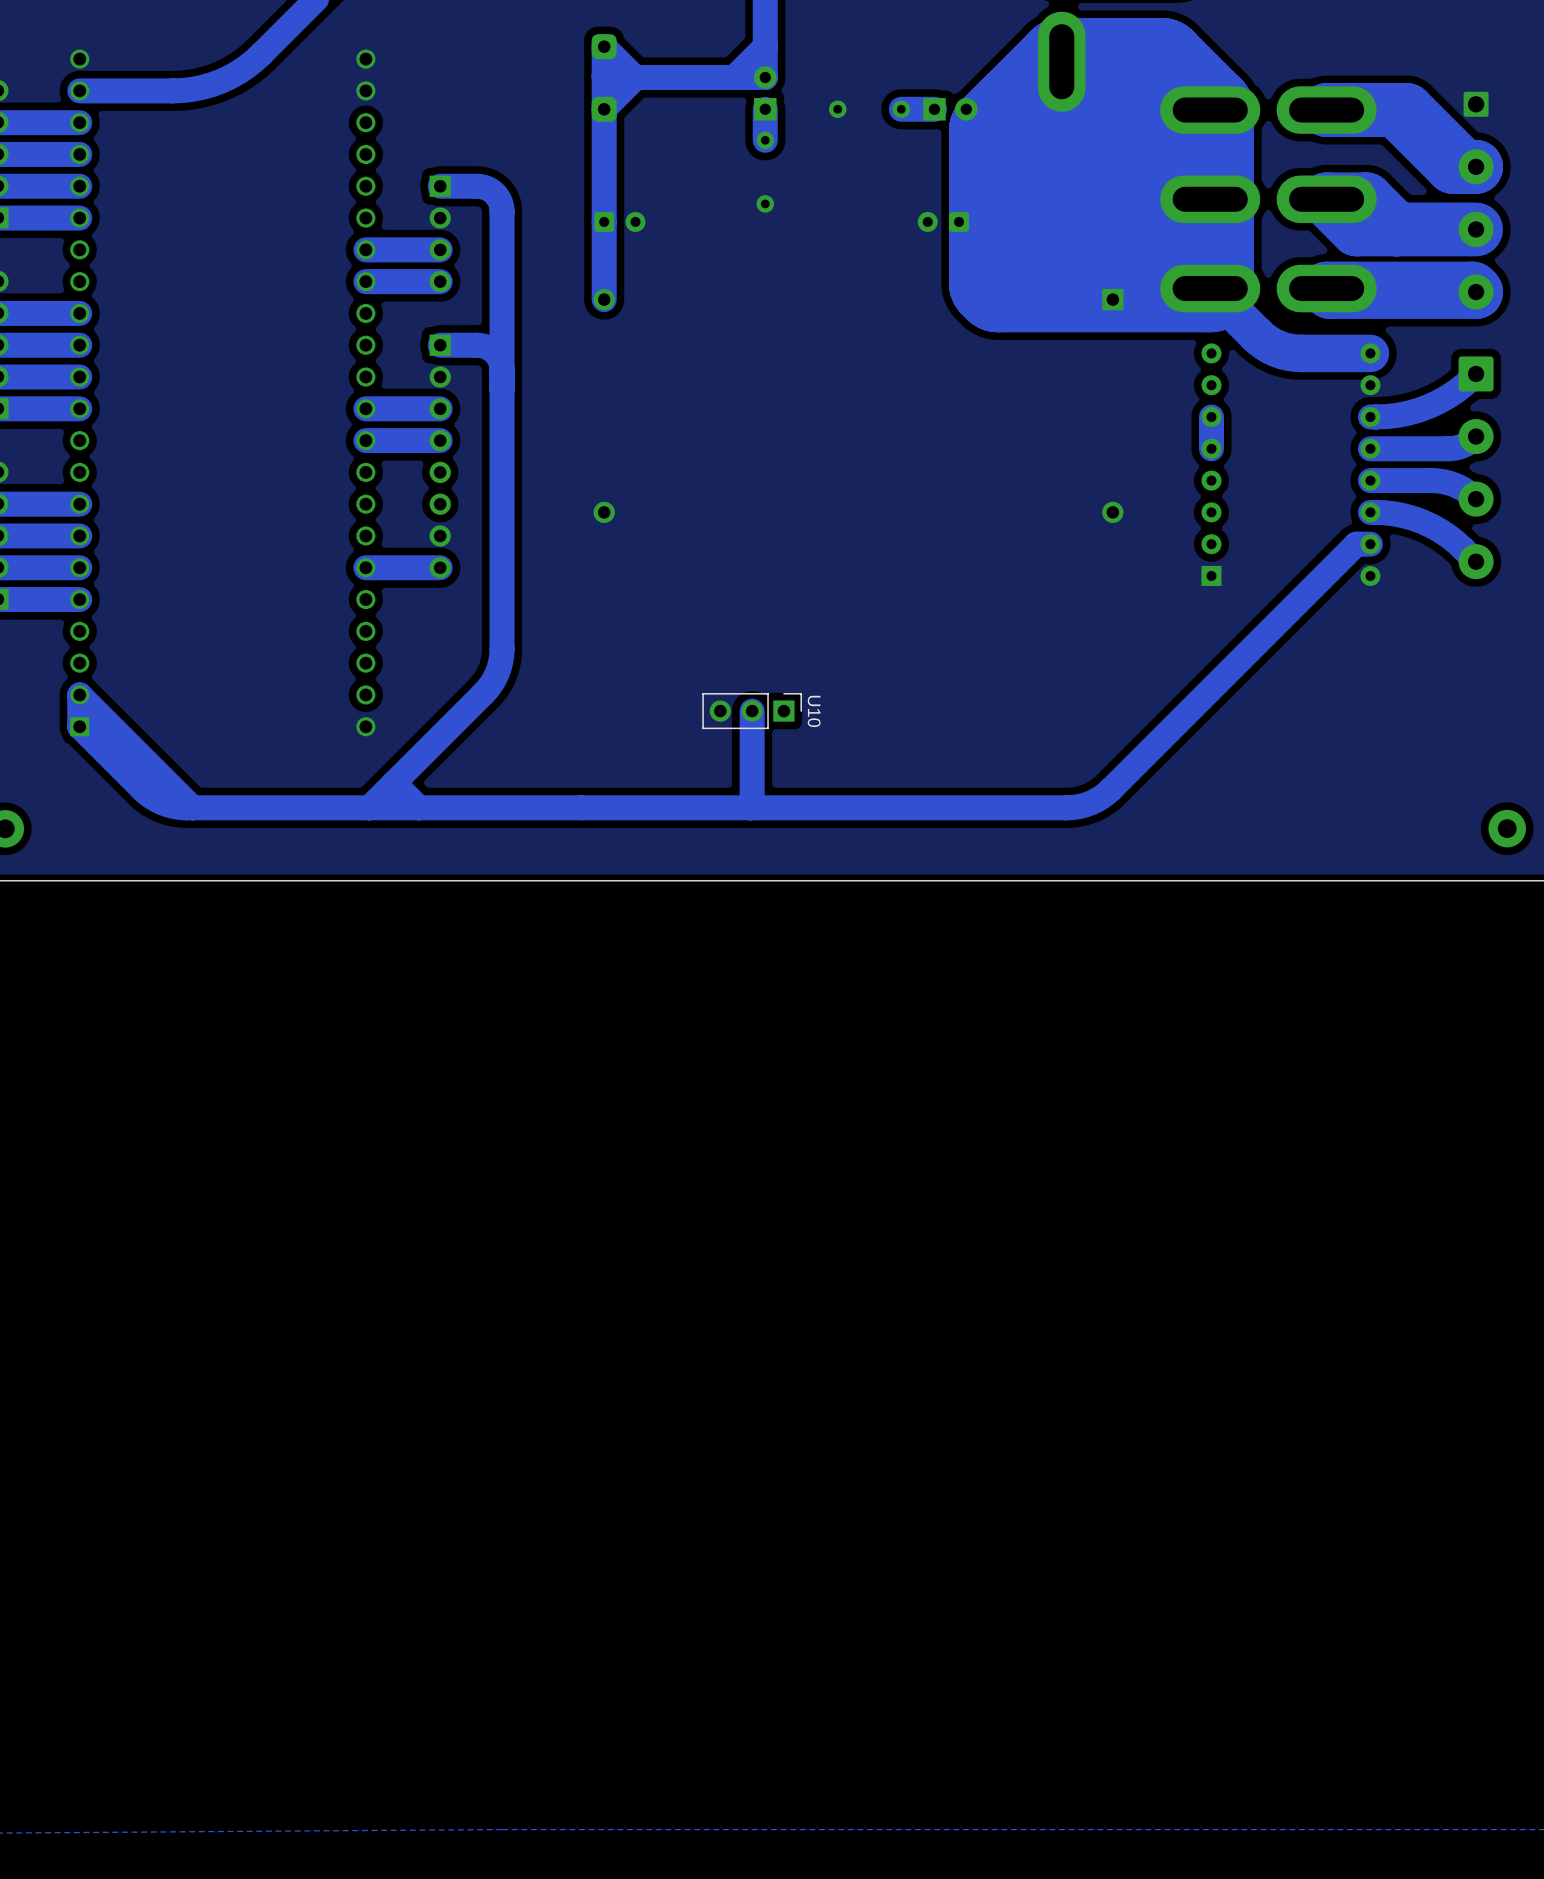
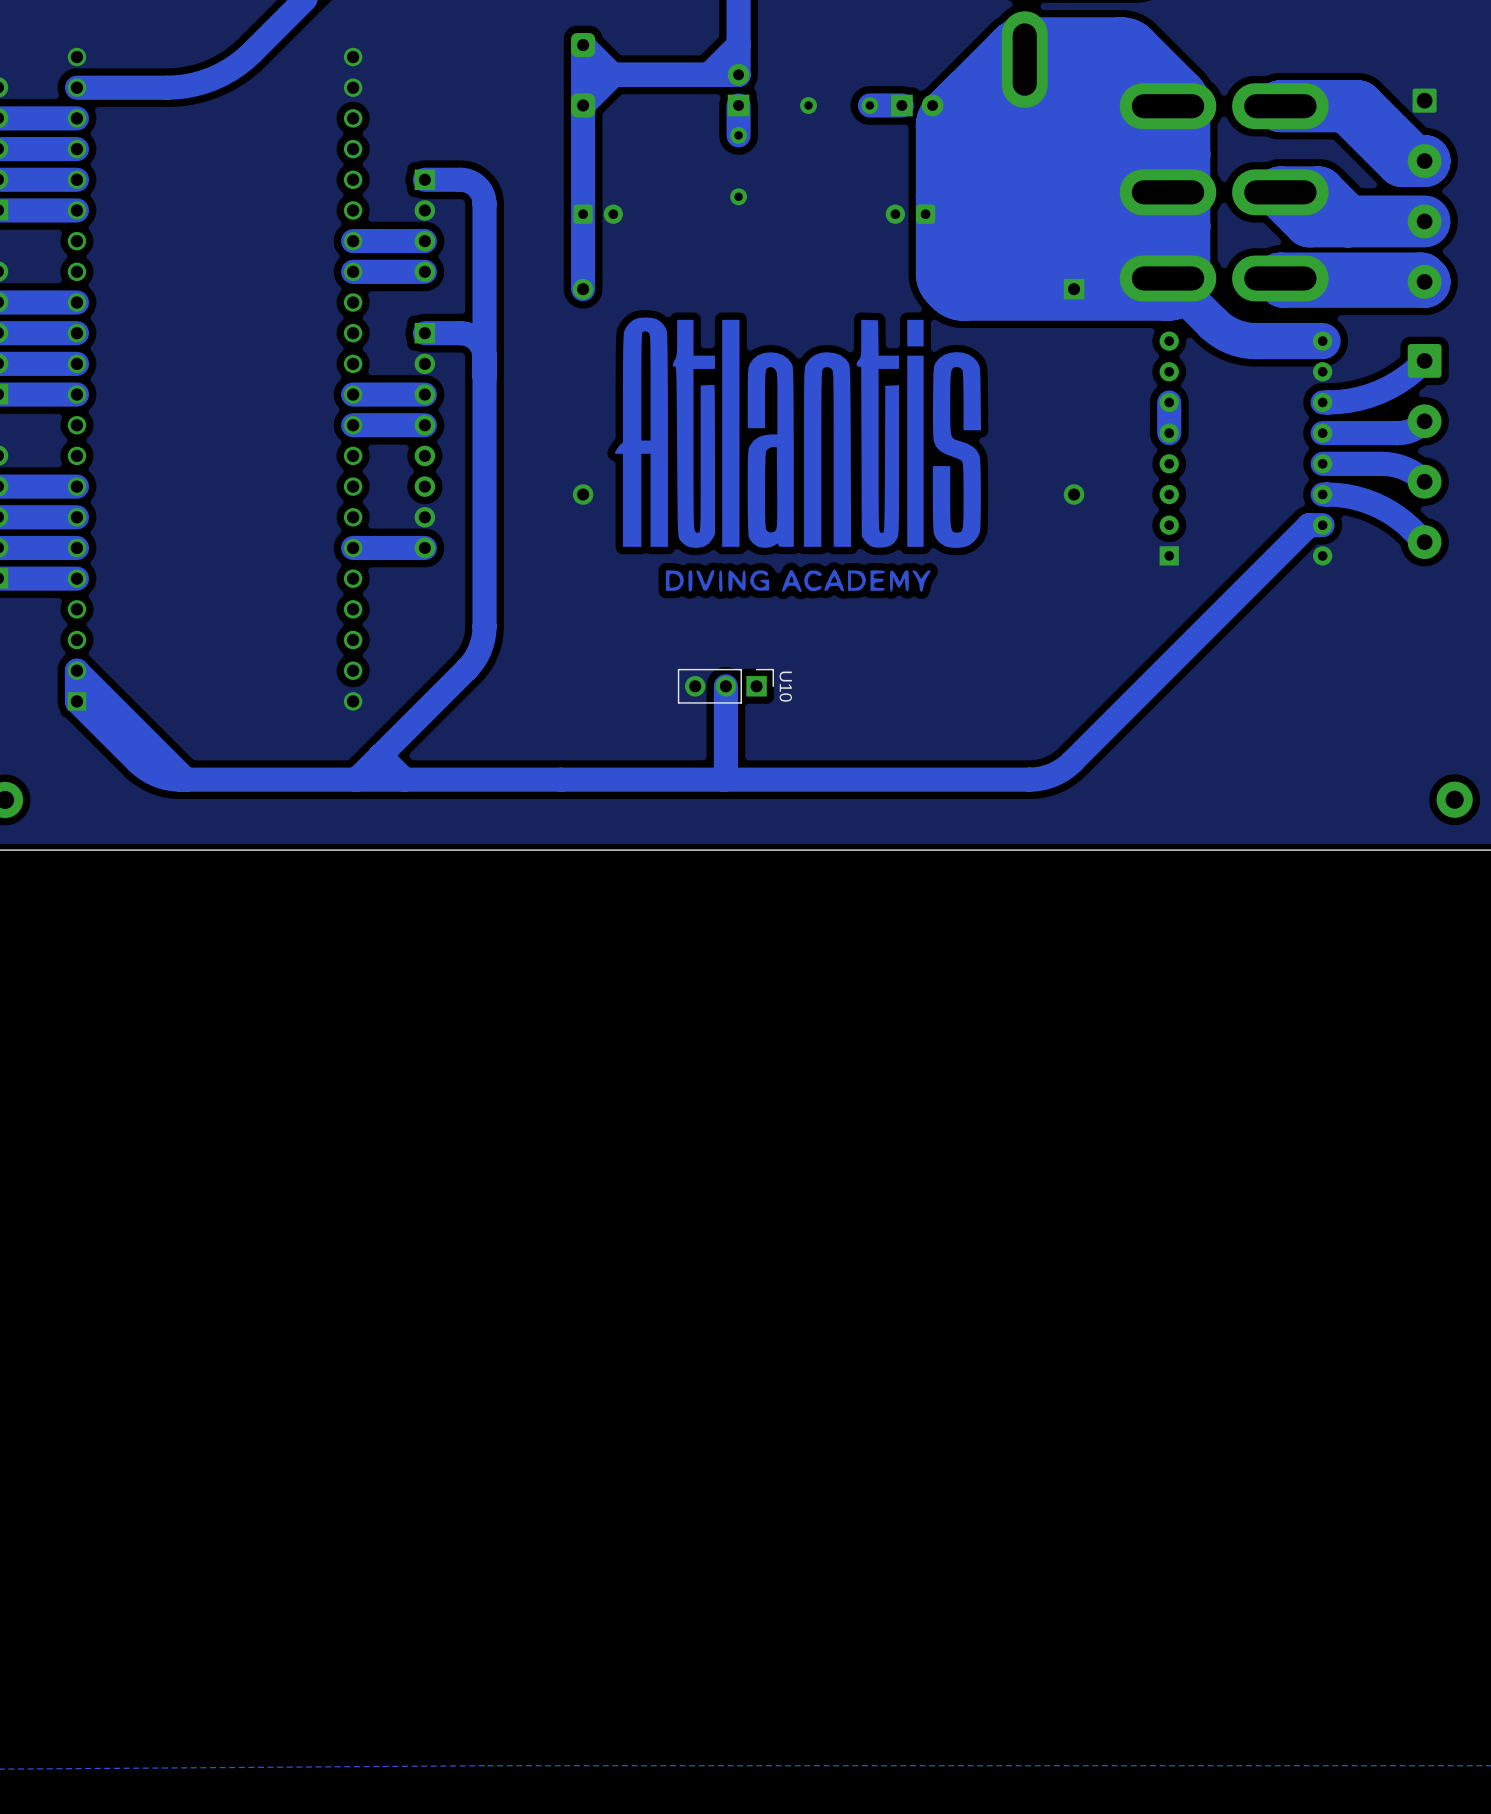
drawing: none -> [614, 317, 982, 592]

